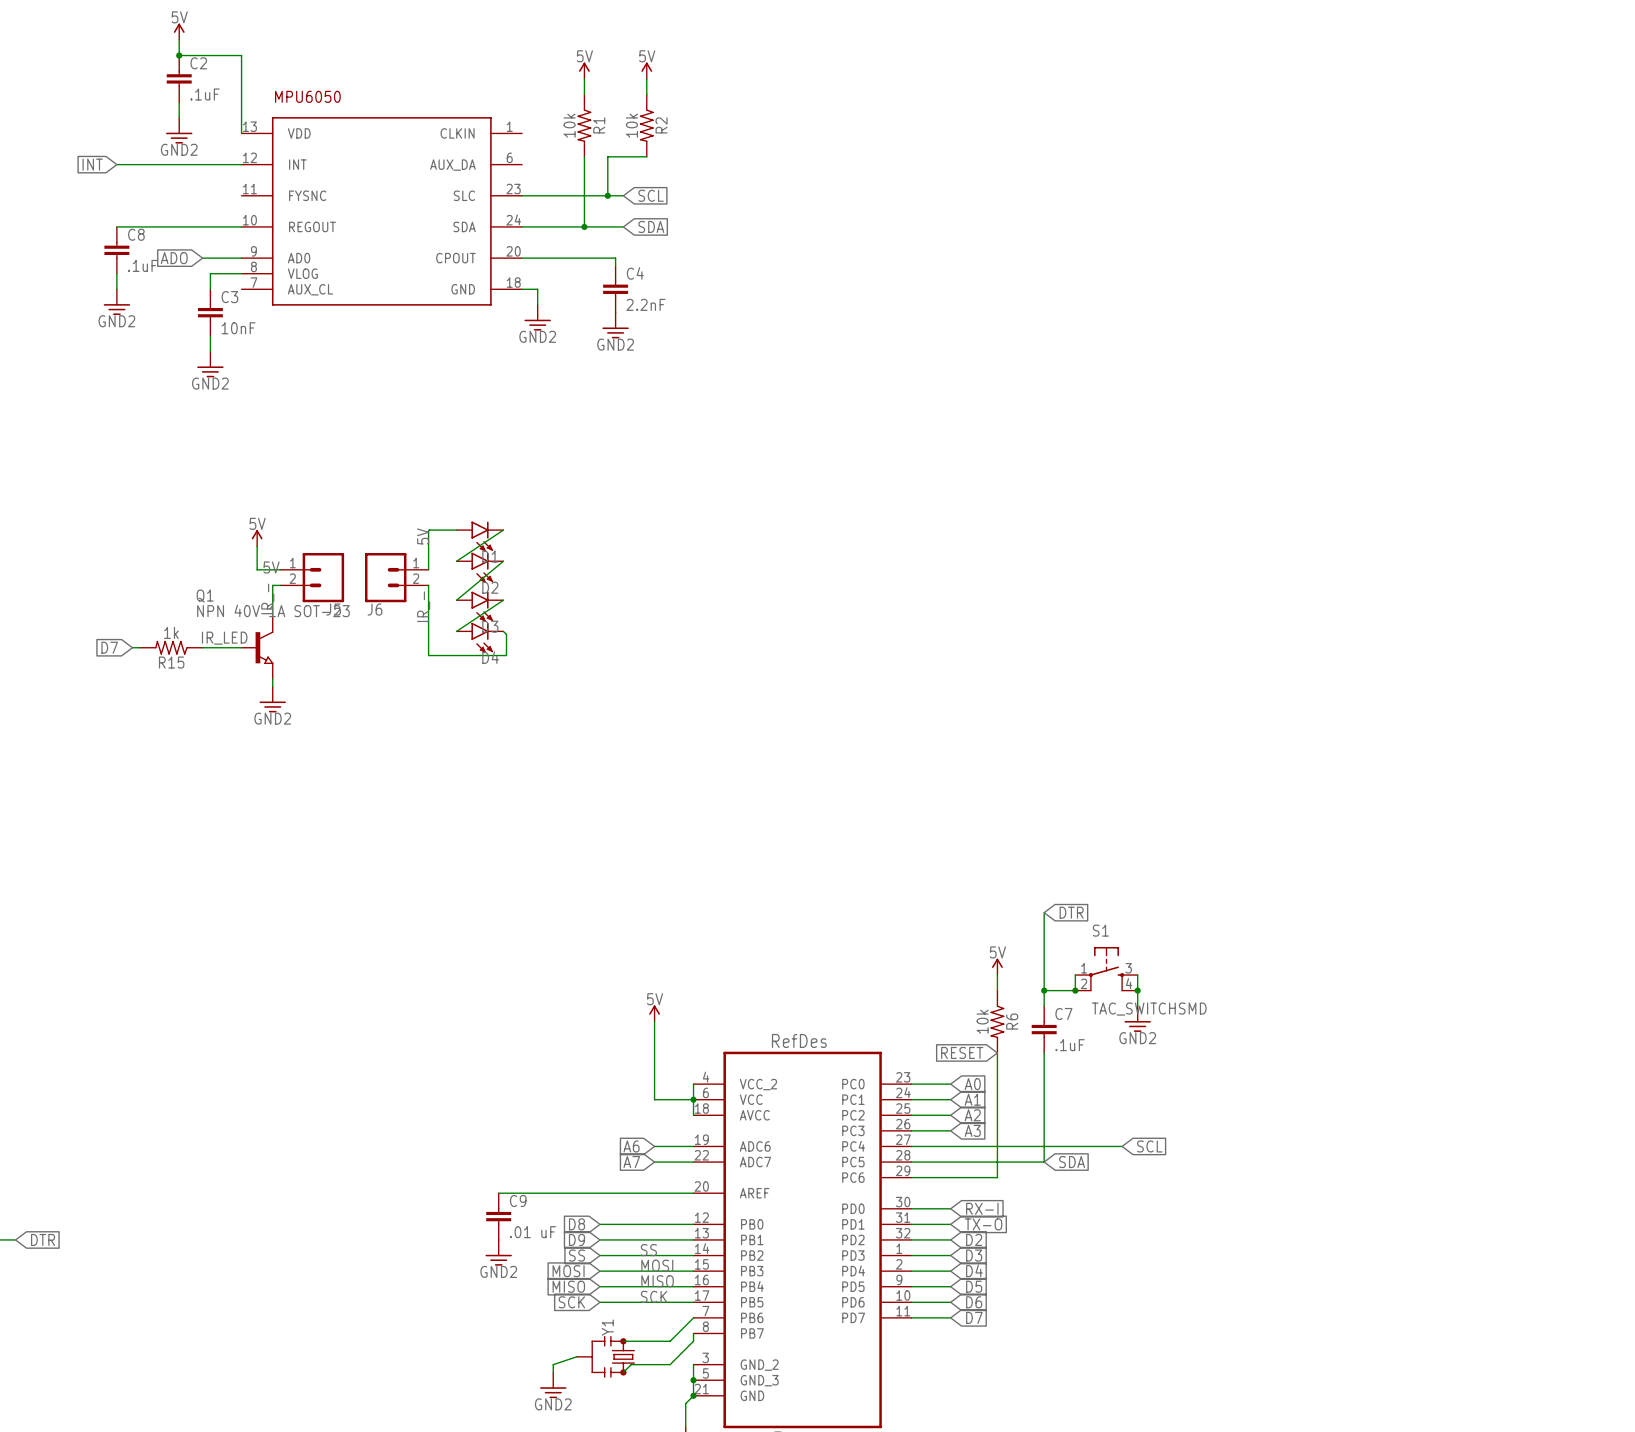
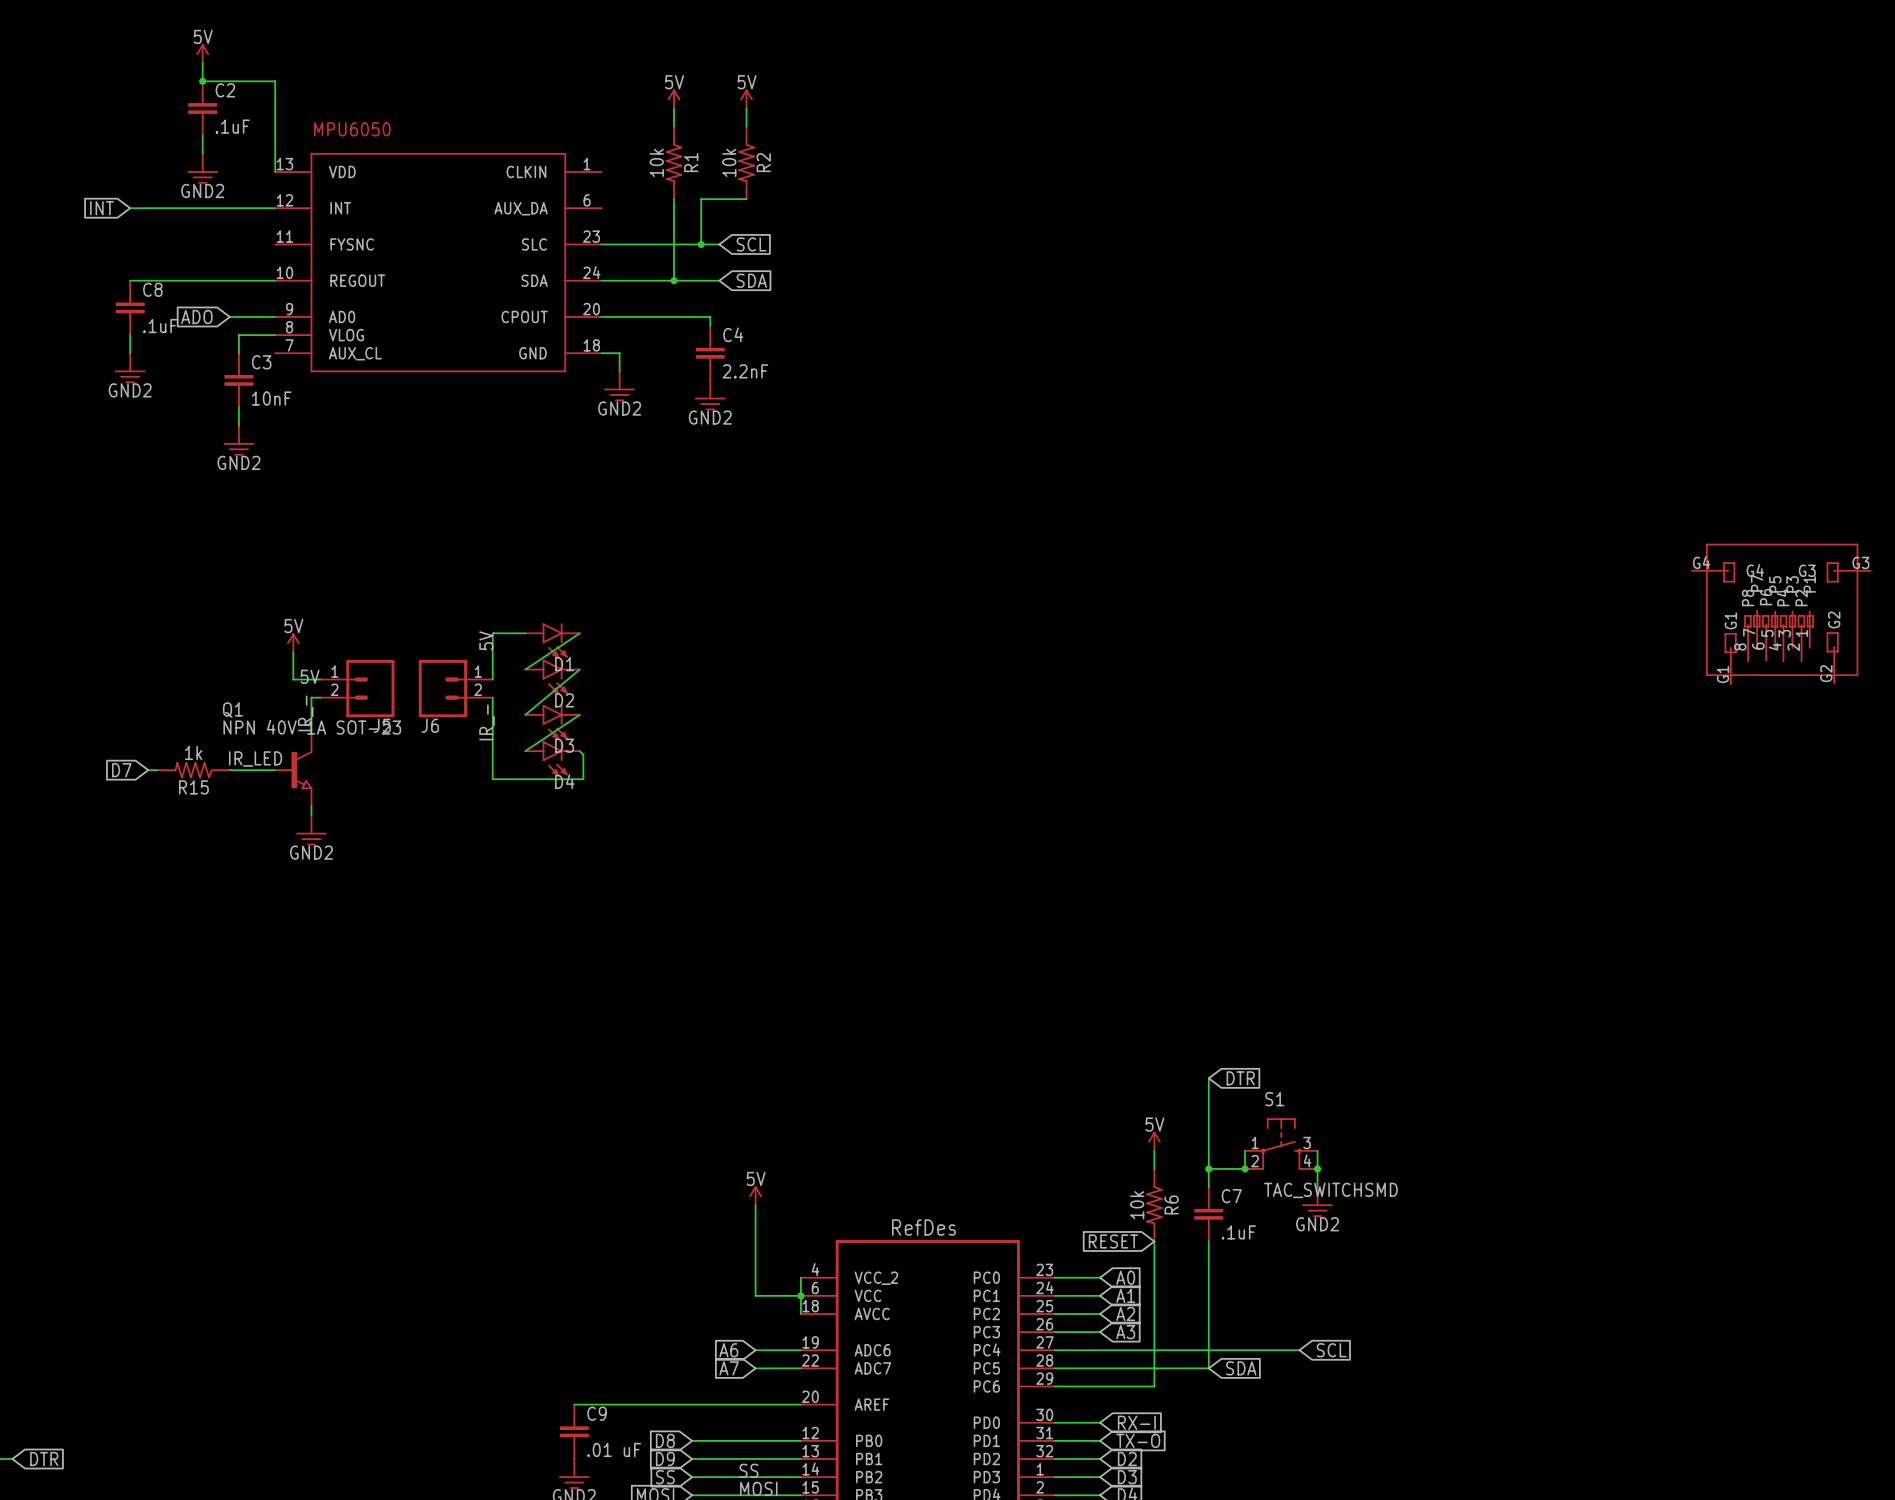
part: none -> (1781, 614)

